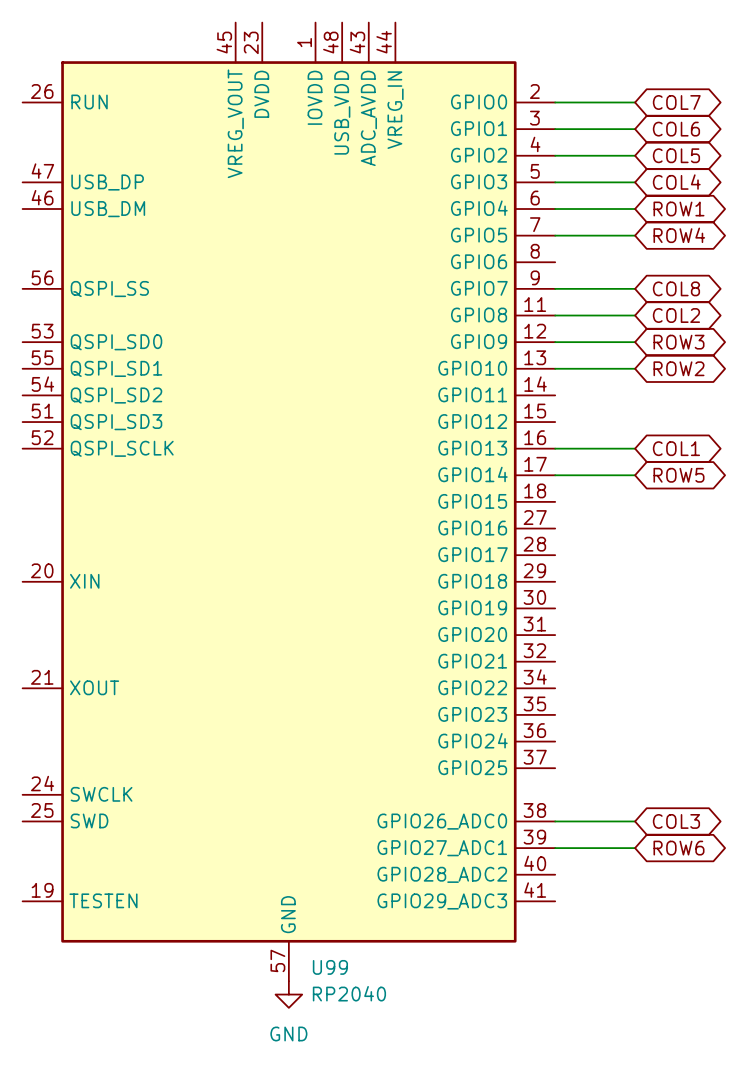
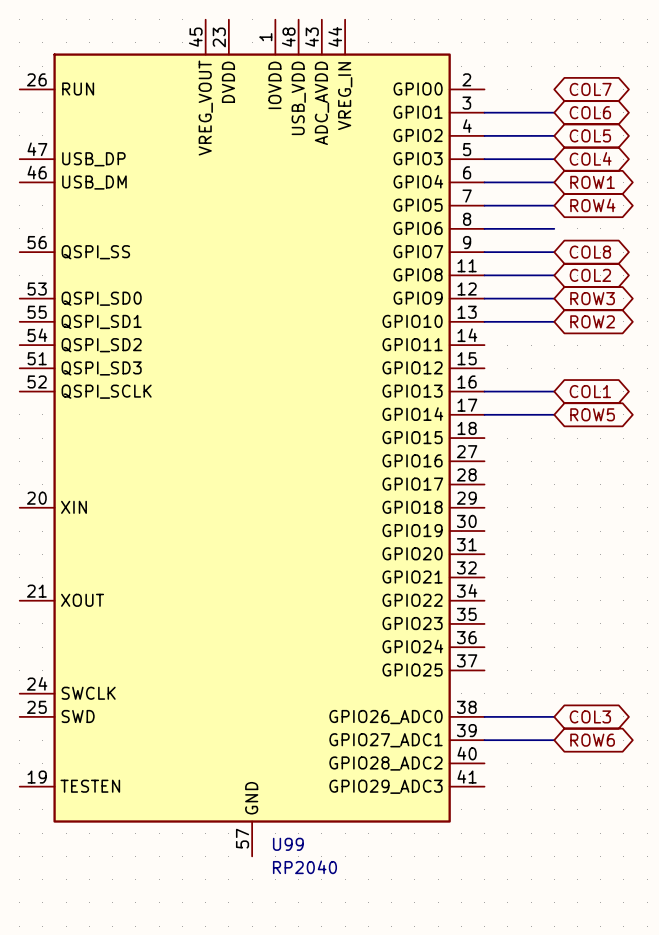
wire: (555, 102) (635, 102) -> (484, 228) (554, 228)
power symbol: GND (288, 994) -> none

